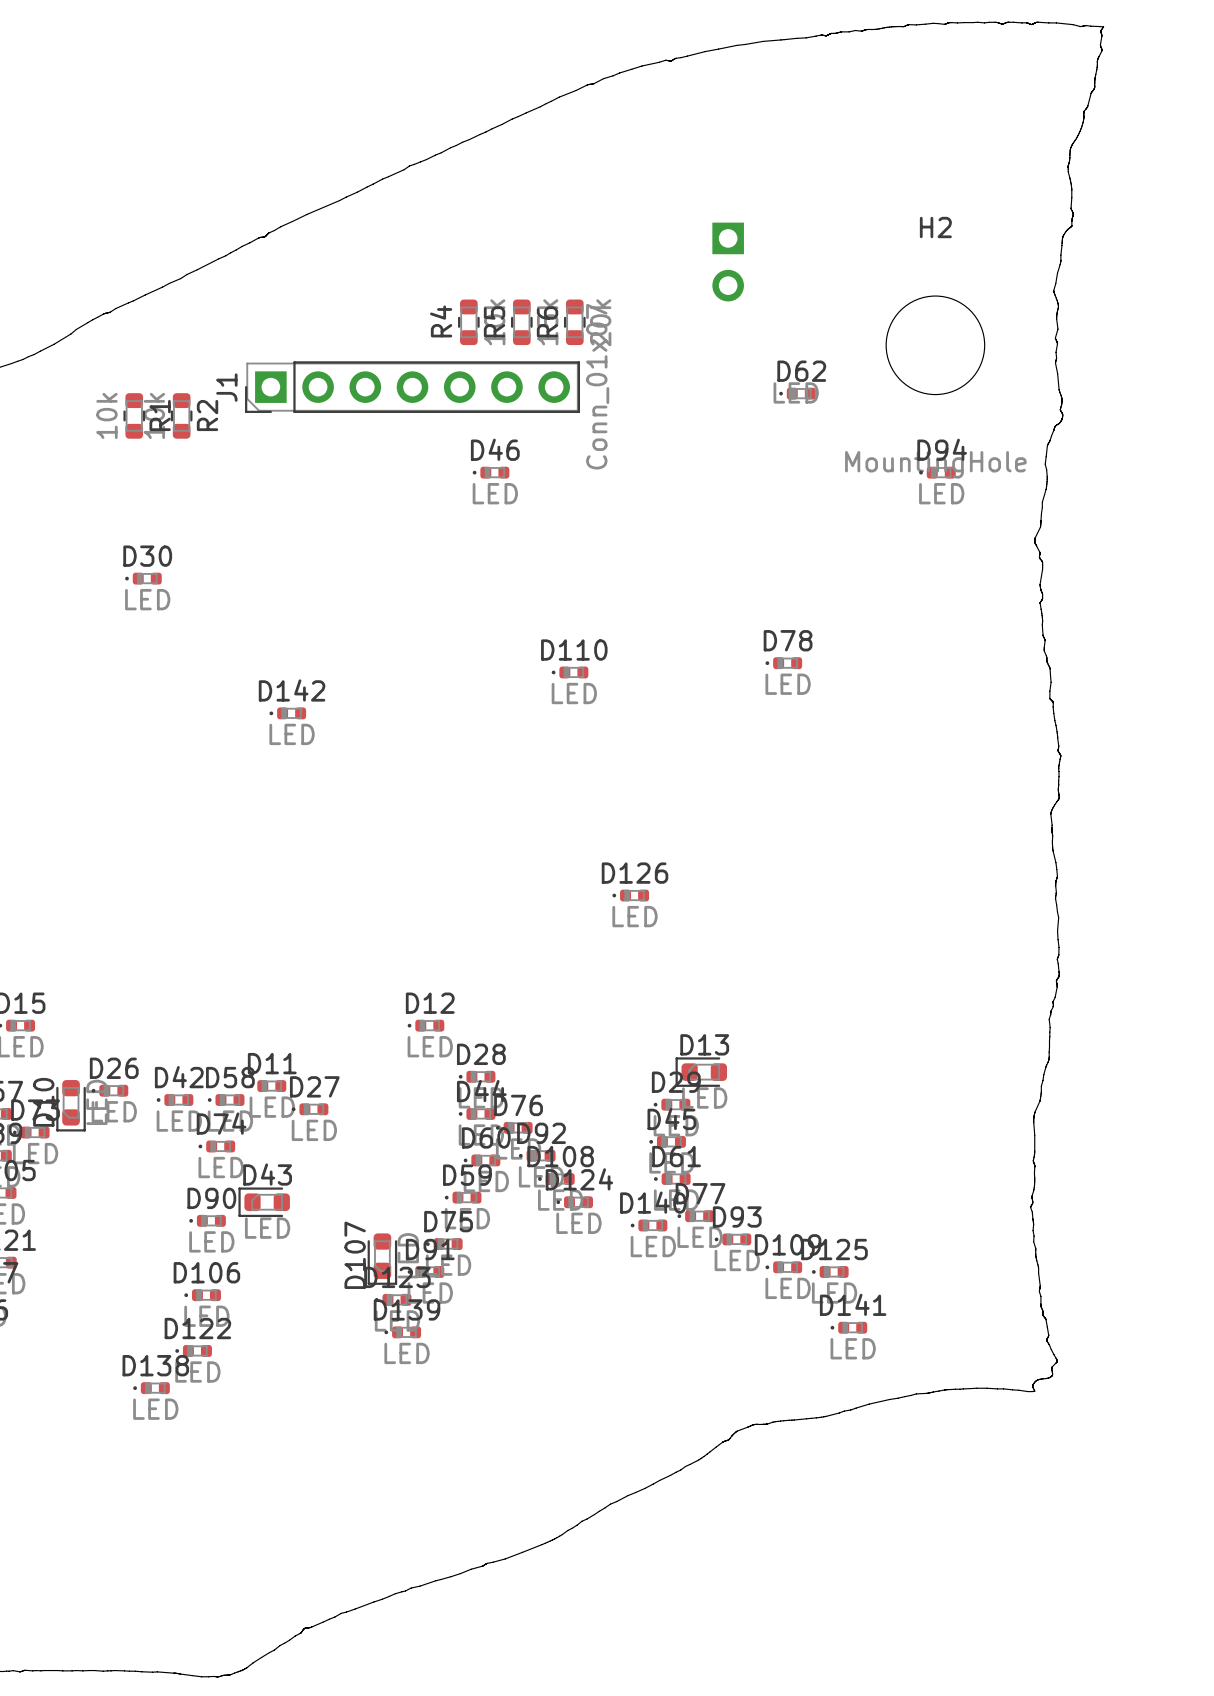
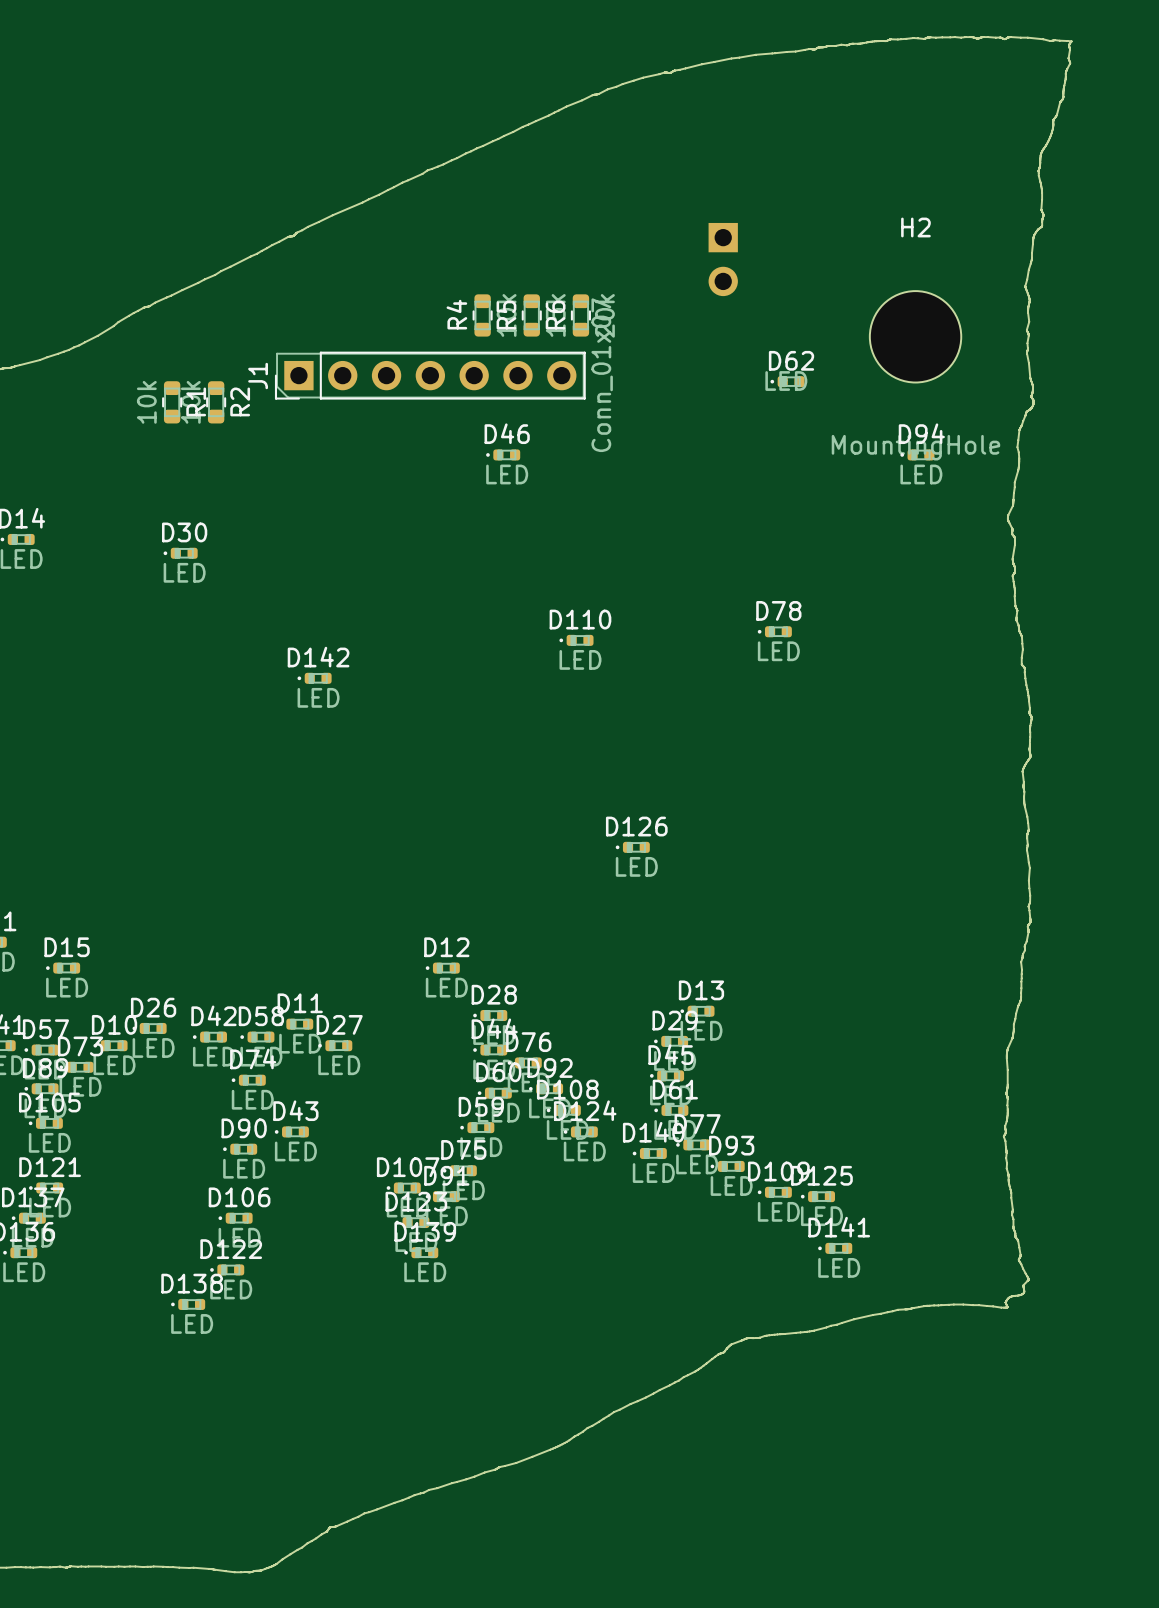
D13 footprint: [675, 1057, 728, 1087] -> [680, 1005, 715, 1017]
D10 footprint: [56, 1080, 86, 1132] -> [93, 1040, 128, 1052]
D43 footprint: [238, 1187, 290, 1218] -> [274, 1126, 309, 1138]
D107 footprint: [367, 1233, 398, 1285] -> [386, 1182, 421, 1194]

